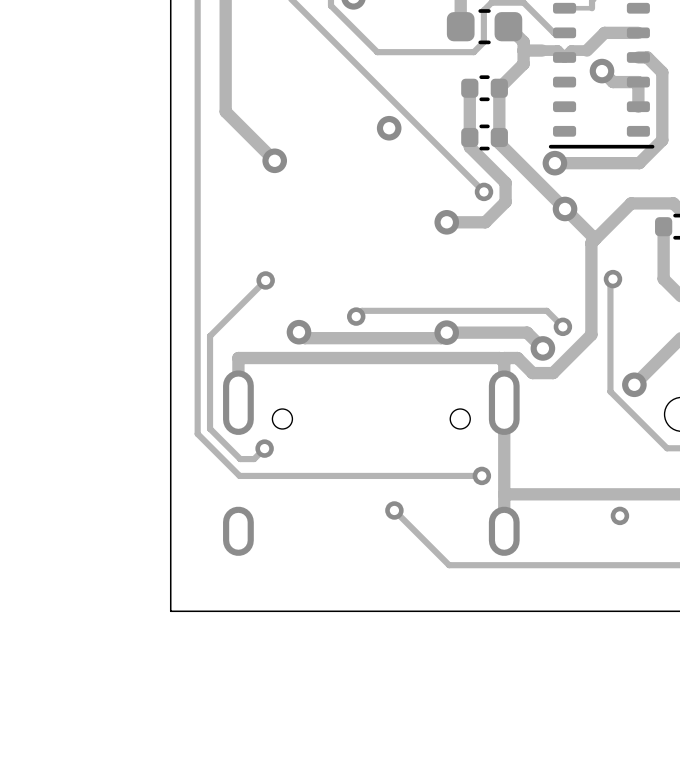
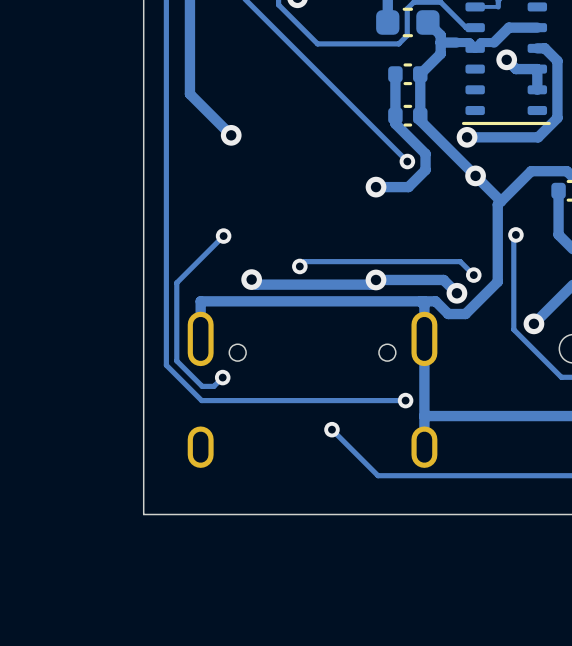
via: (389, 128) -> none
via: (619, 515) -> none

